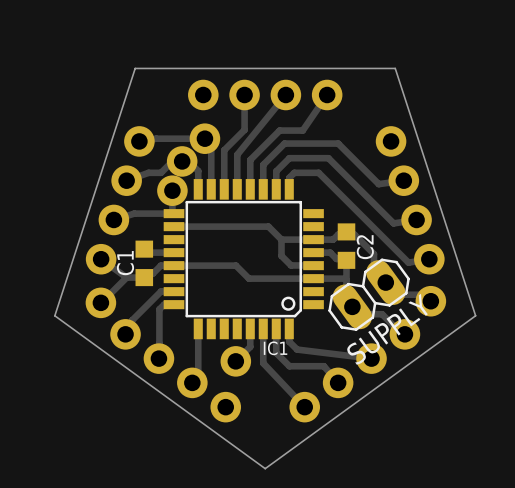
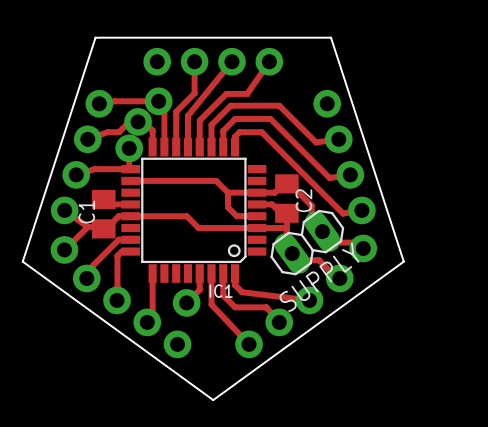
C2 footprint: [337, 223, 356, 269] -> [275, 174, 299, 223]
C1 footprint: [135, 240, 154, 287] -> [92, 189, 116, 239]

